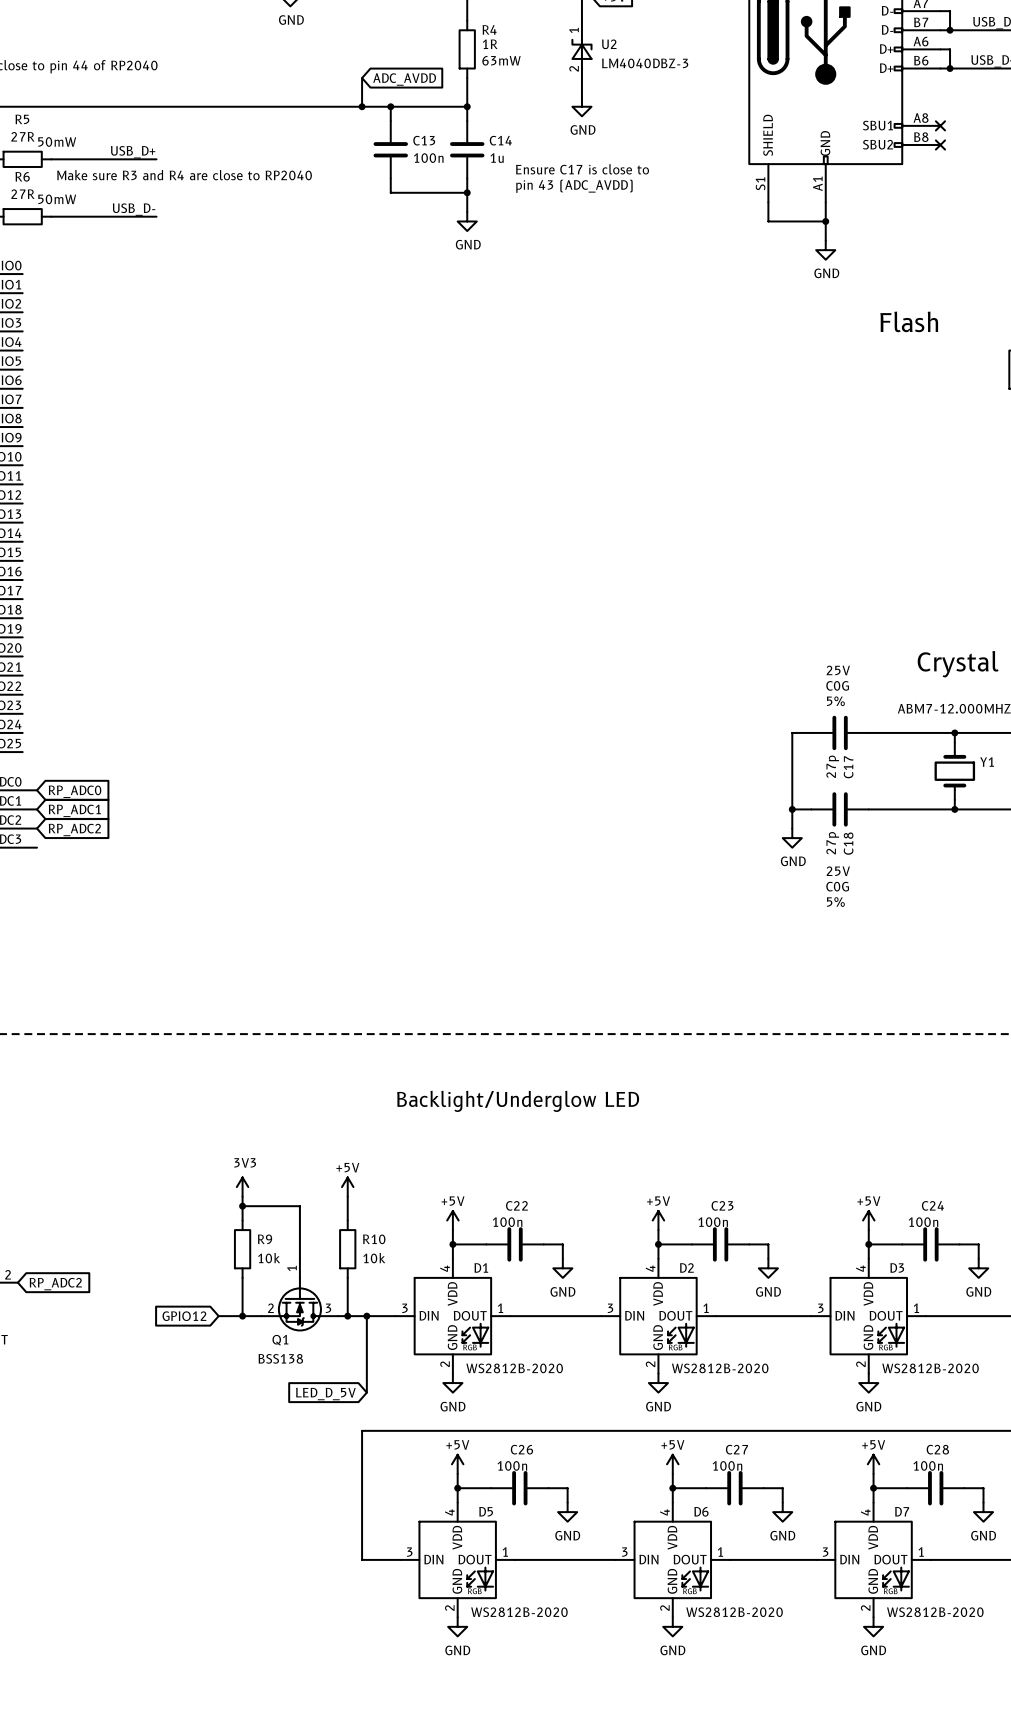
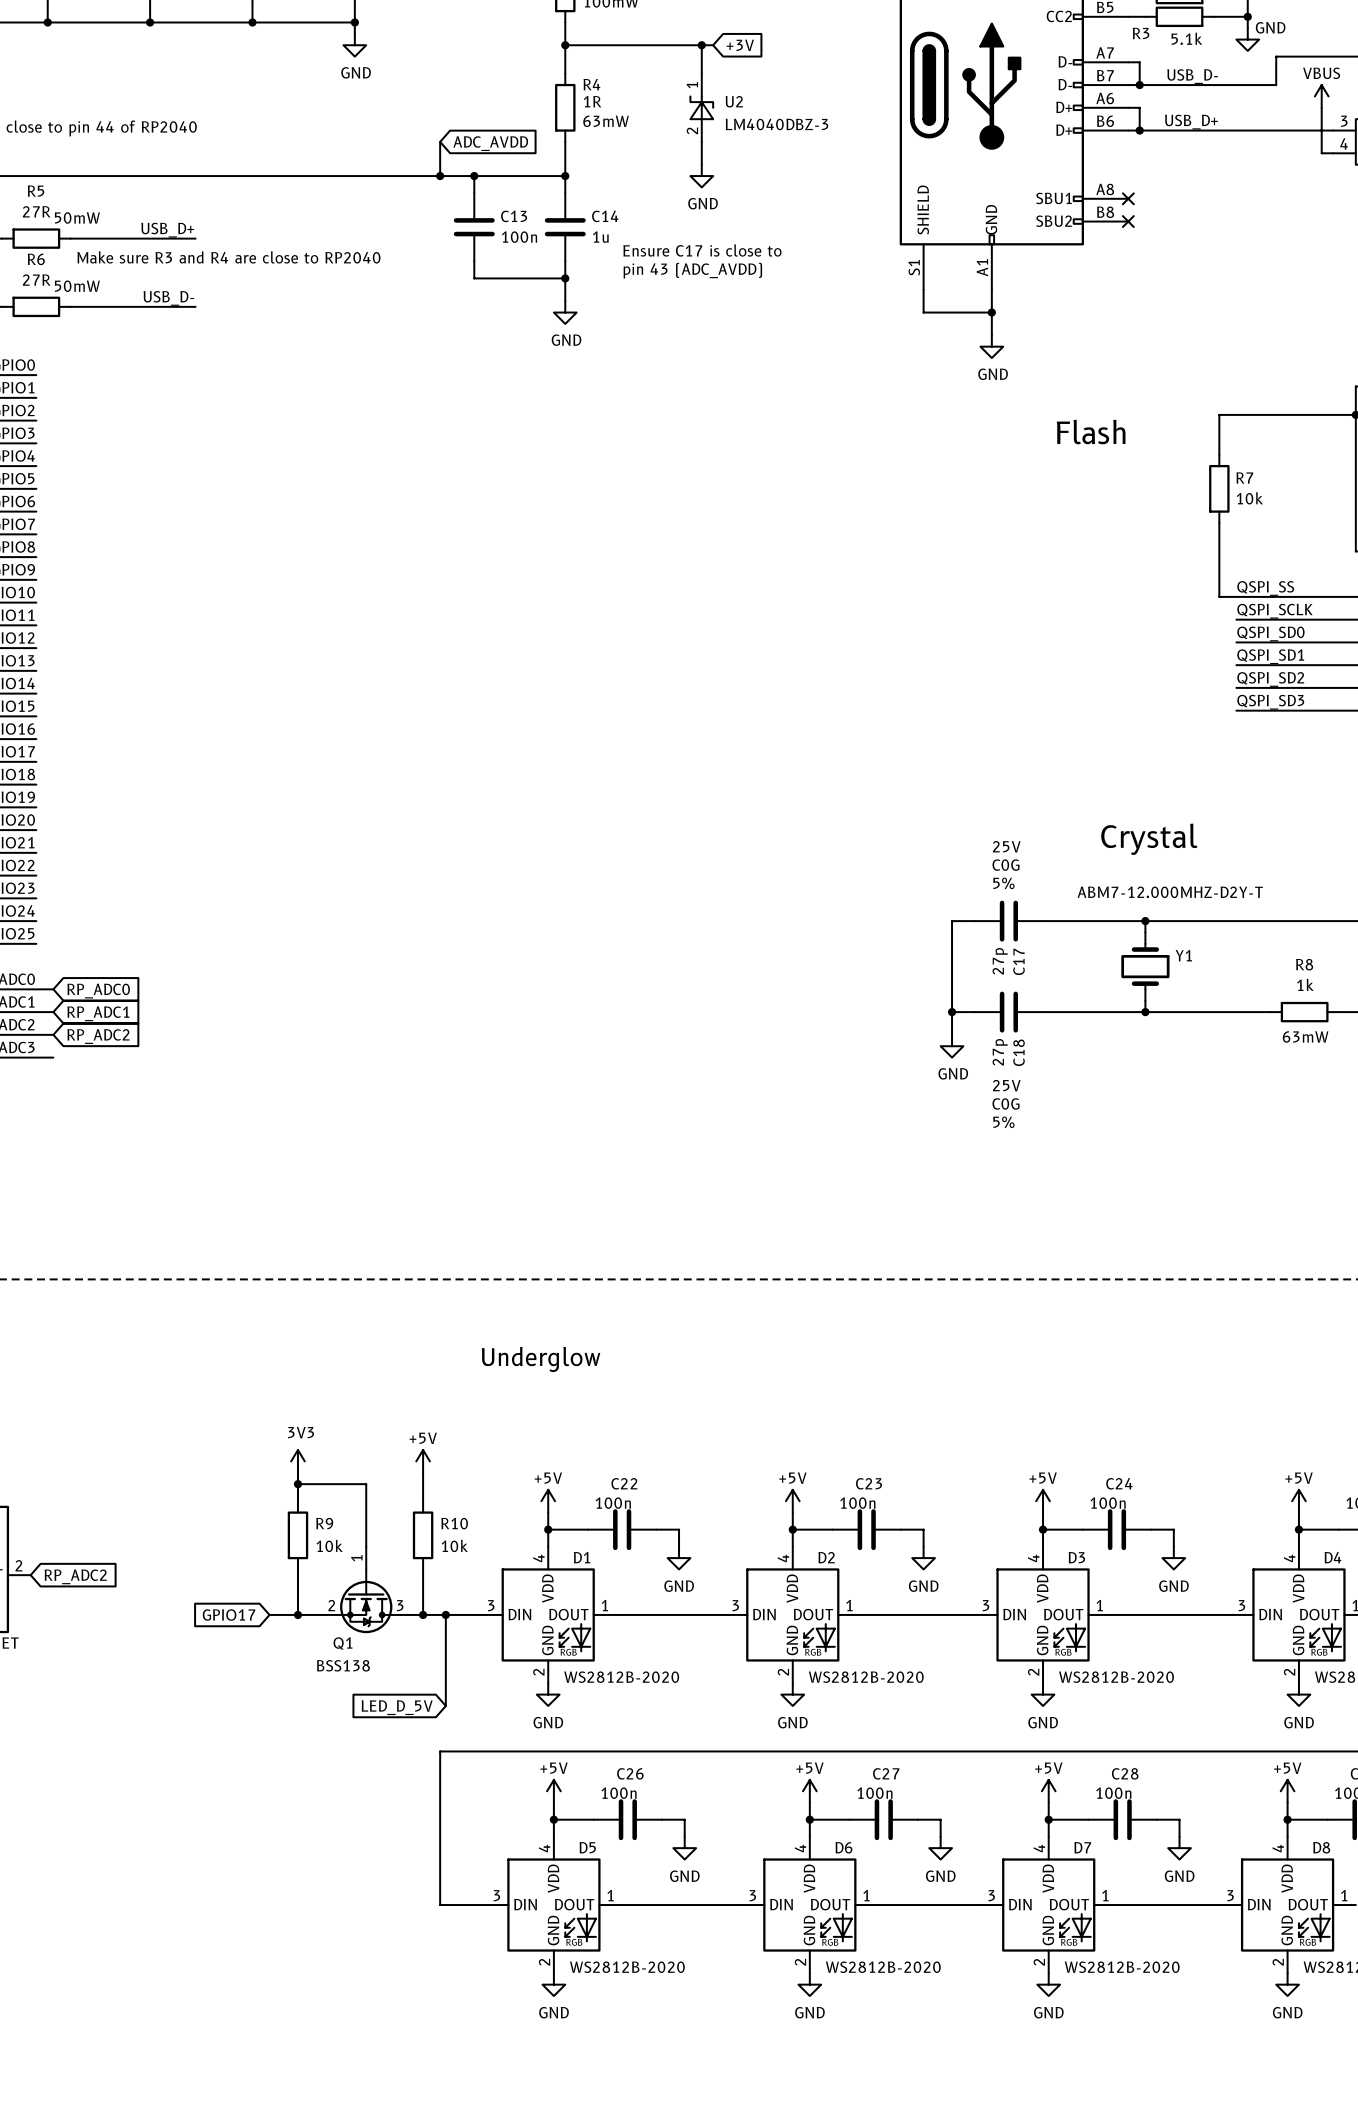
text: Backlight/Underglow LED (518, 1101) -> Underglow (541, 1359)
global label: GPIO12 (184, 1316) -> GPIO17 (229, 1615)

